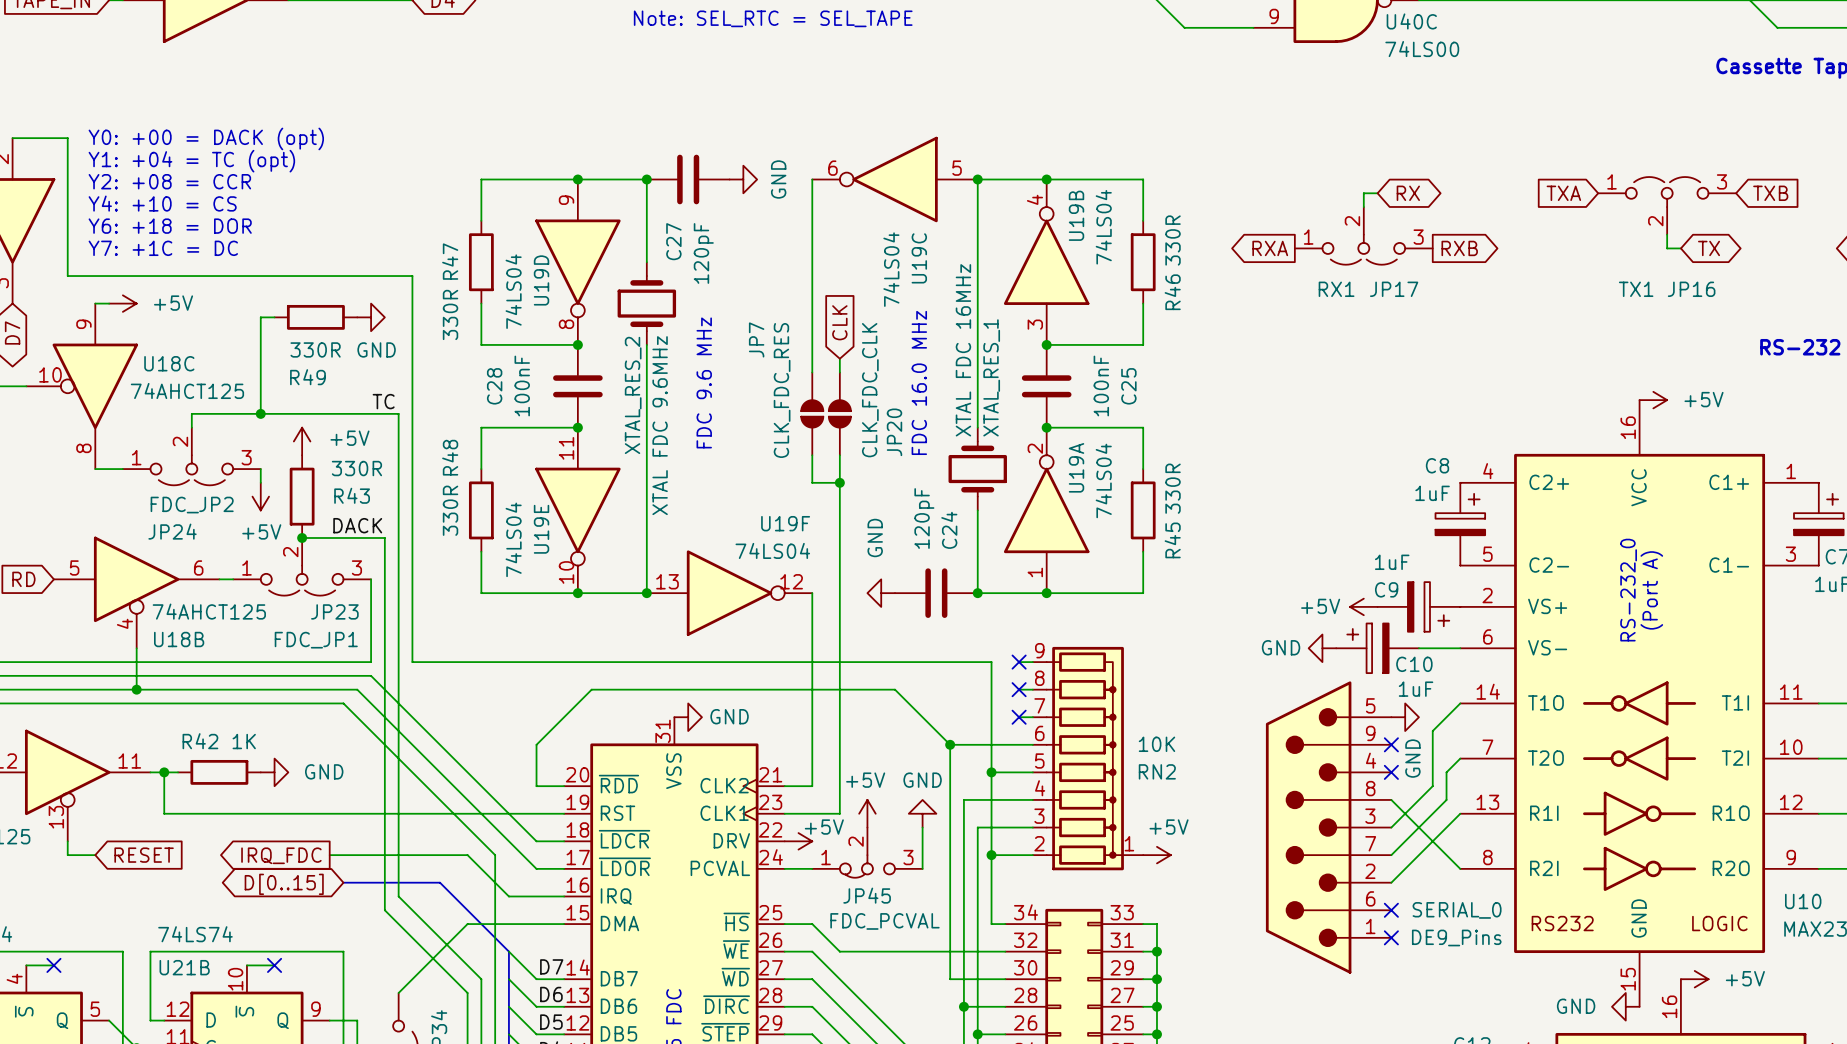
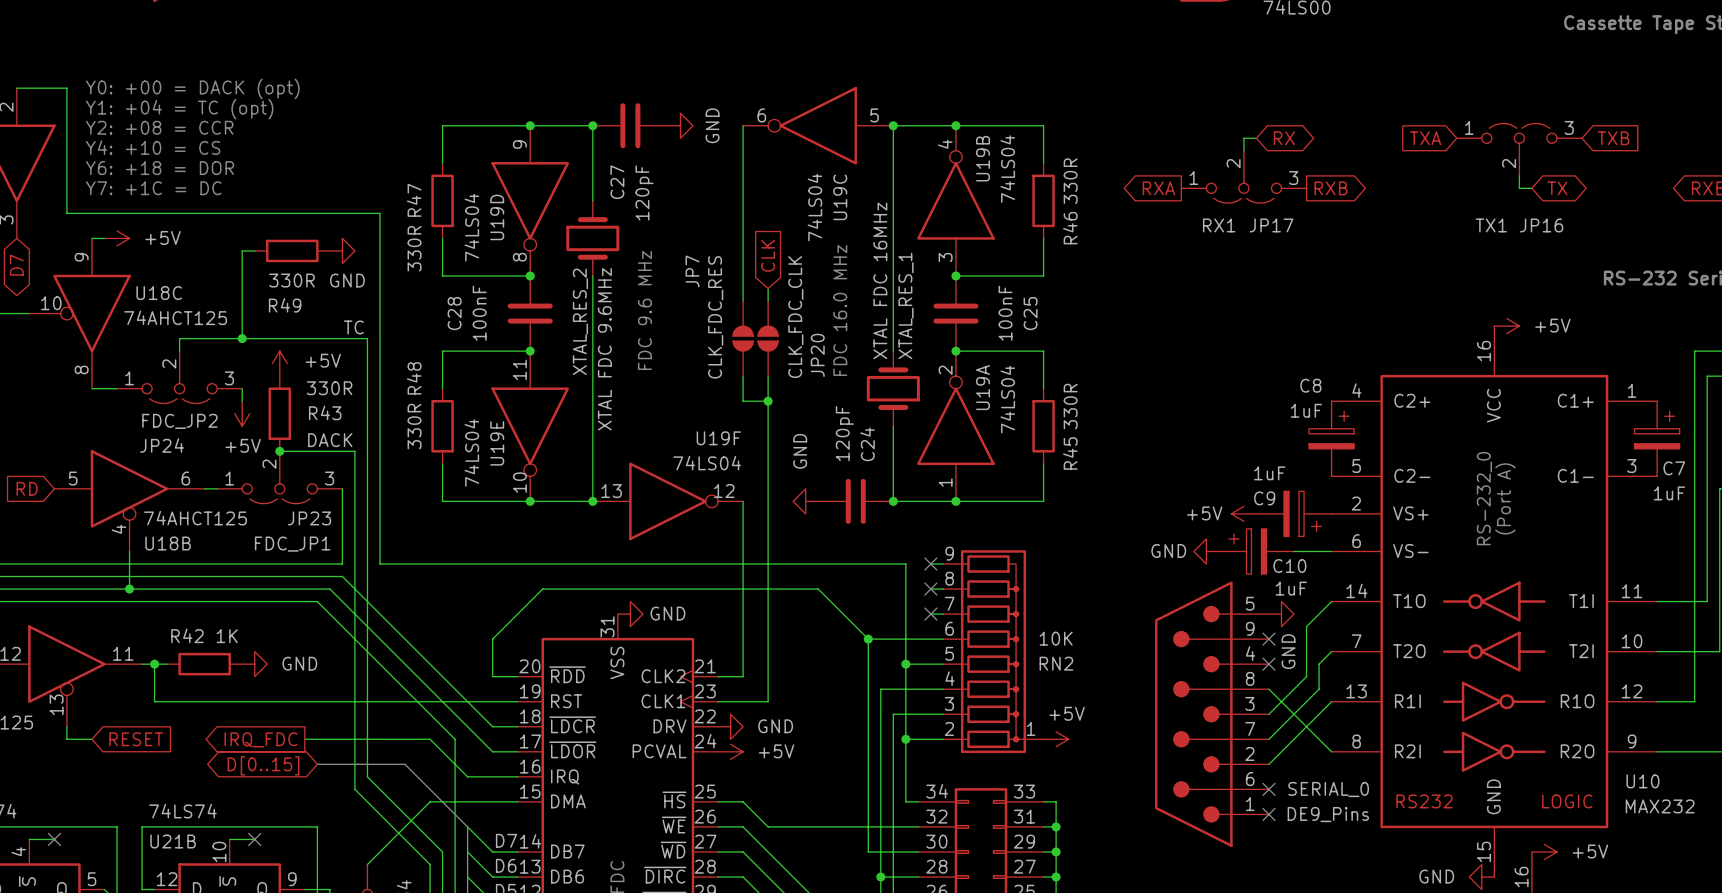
power symbol rotation: 0° (867, 813) -> 90° clockwise (730, 751)
power symbol position: +5V (867, 813) -> +5V (730, 751)
power symbol: GND (922, 813) -> none
wire: (922, 827) (922, 868) -> none
power symbol: +5V (798, 841) -> GND (730, 726)
JP45: FDC_PCVAL (867, 852) -> none

